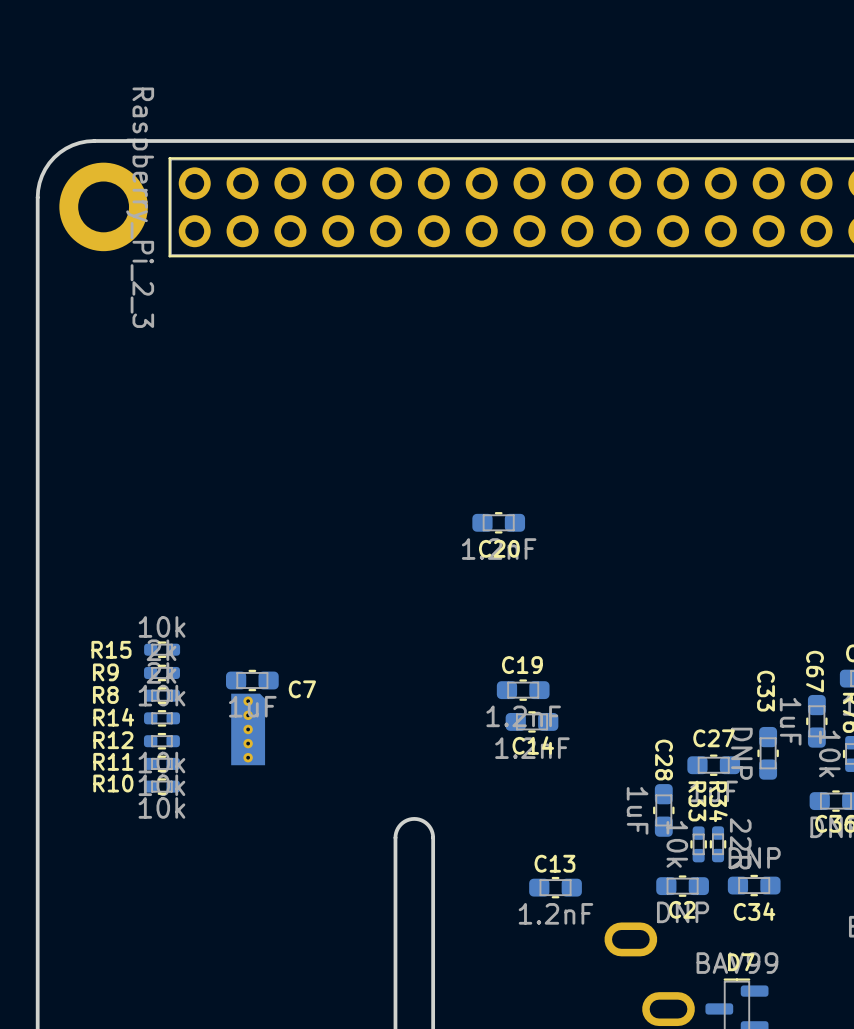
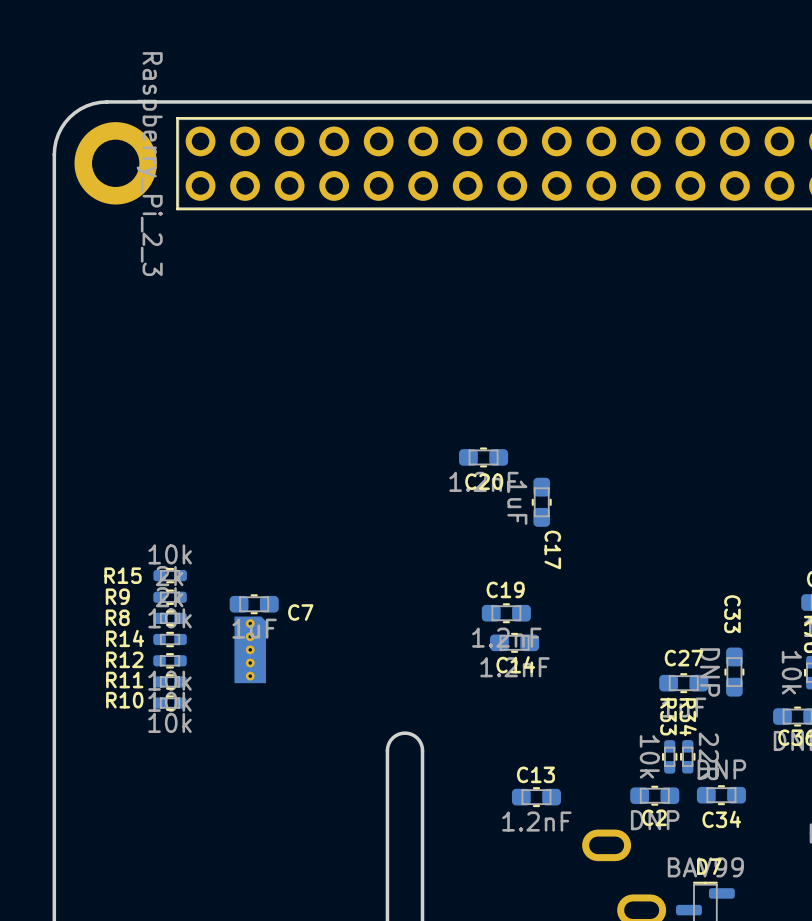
C17: none -> 1uF (541, 502)
C67: 1uF (816, 721) -> none
C28: 1uF (663, 810) -> none

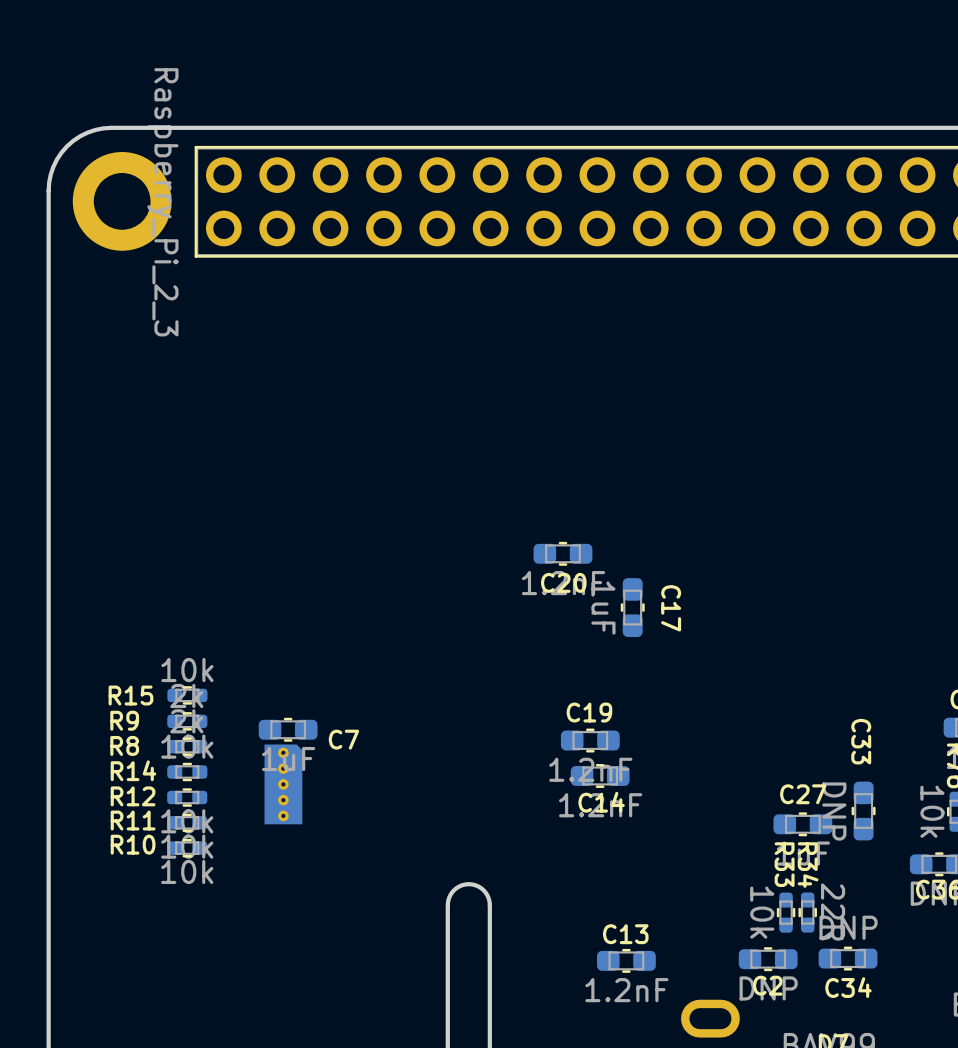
C17 name position: C17 (552, 549) -> C17 (671, 608)

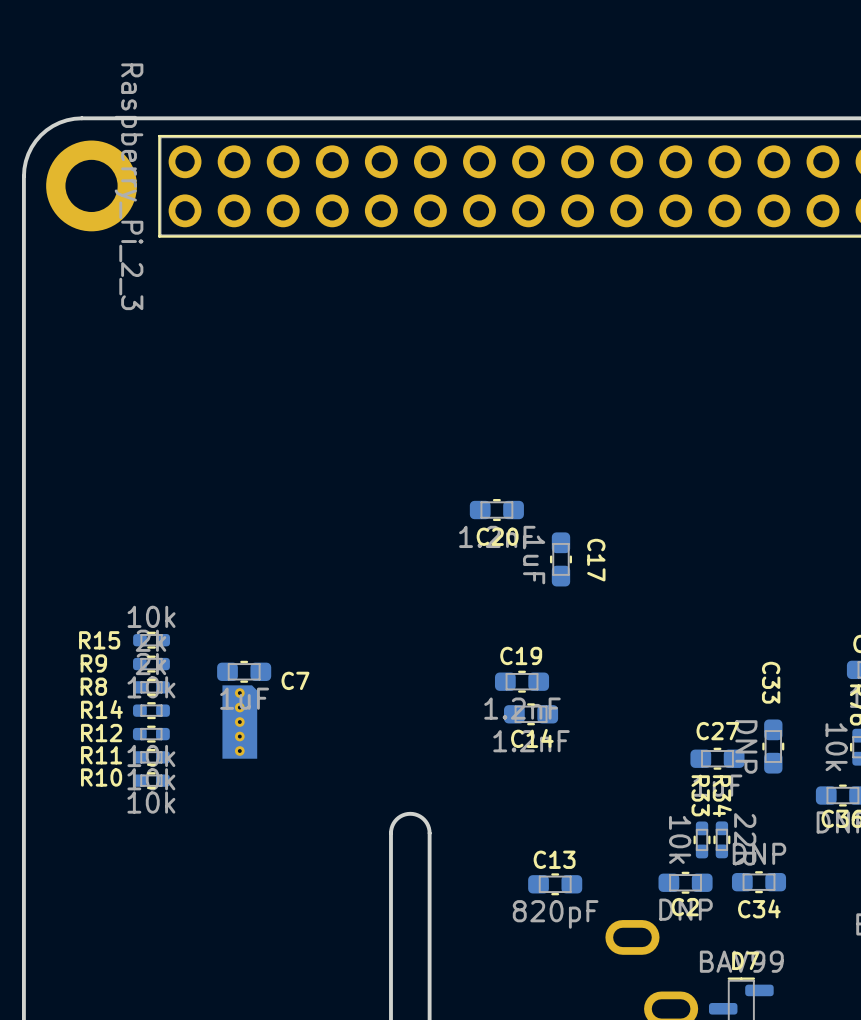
C13 value: 1.2nF (626, 990) -> 820pF (555, 914)

